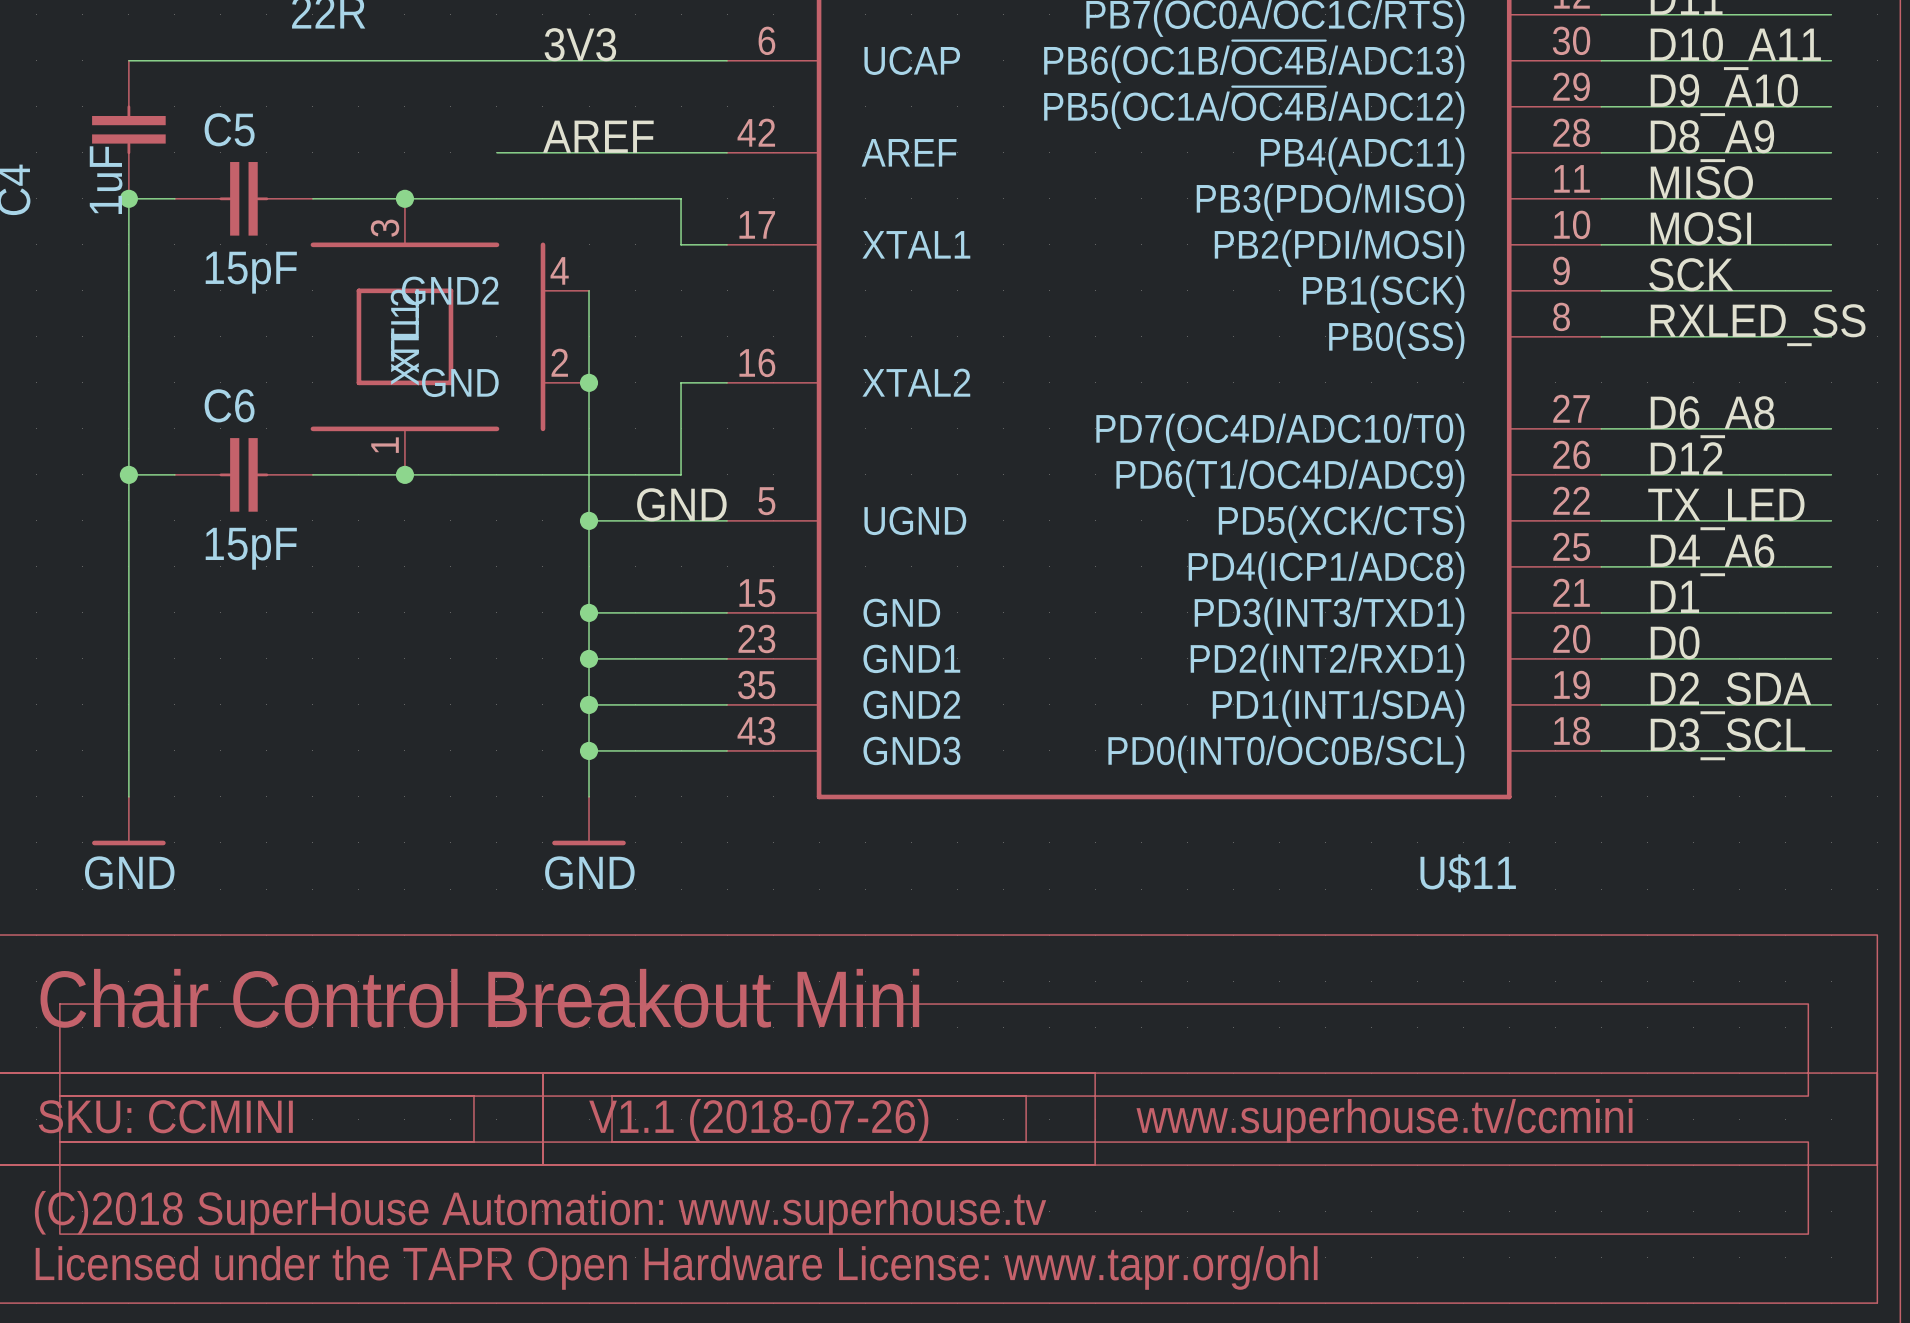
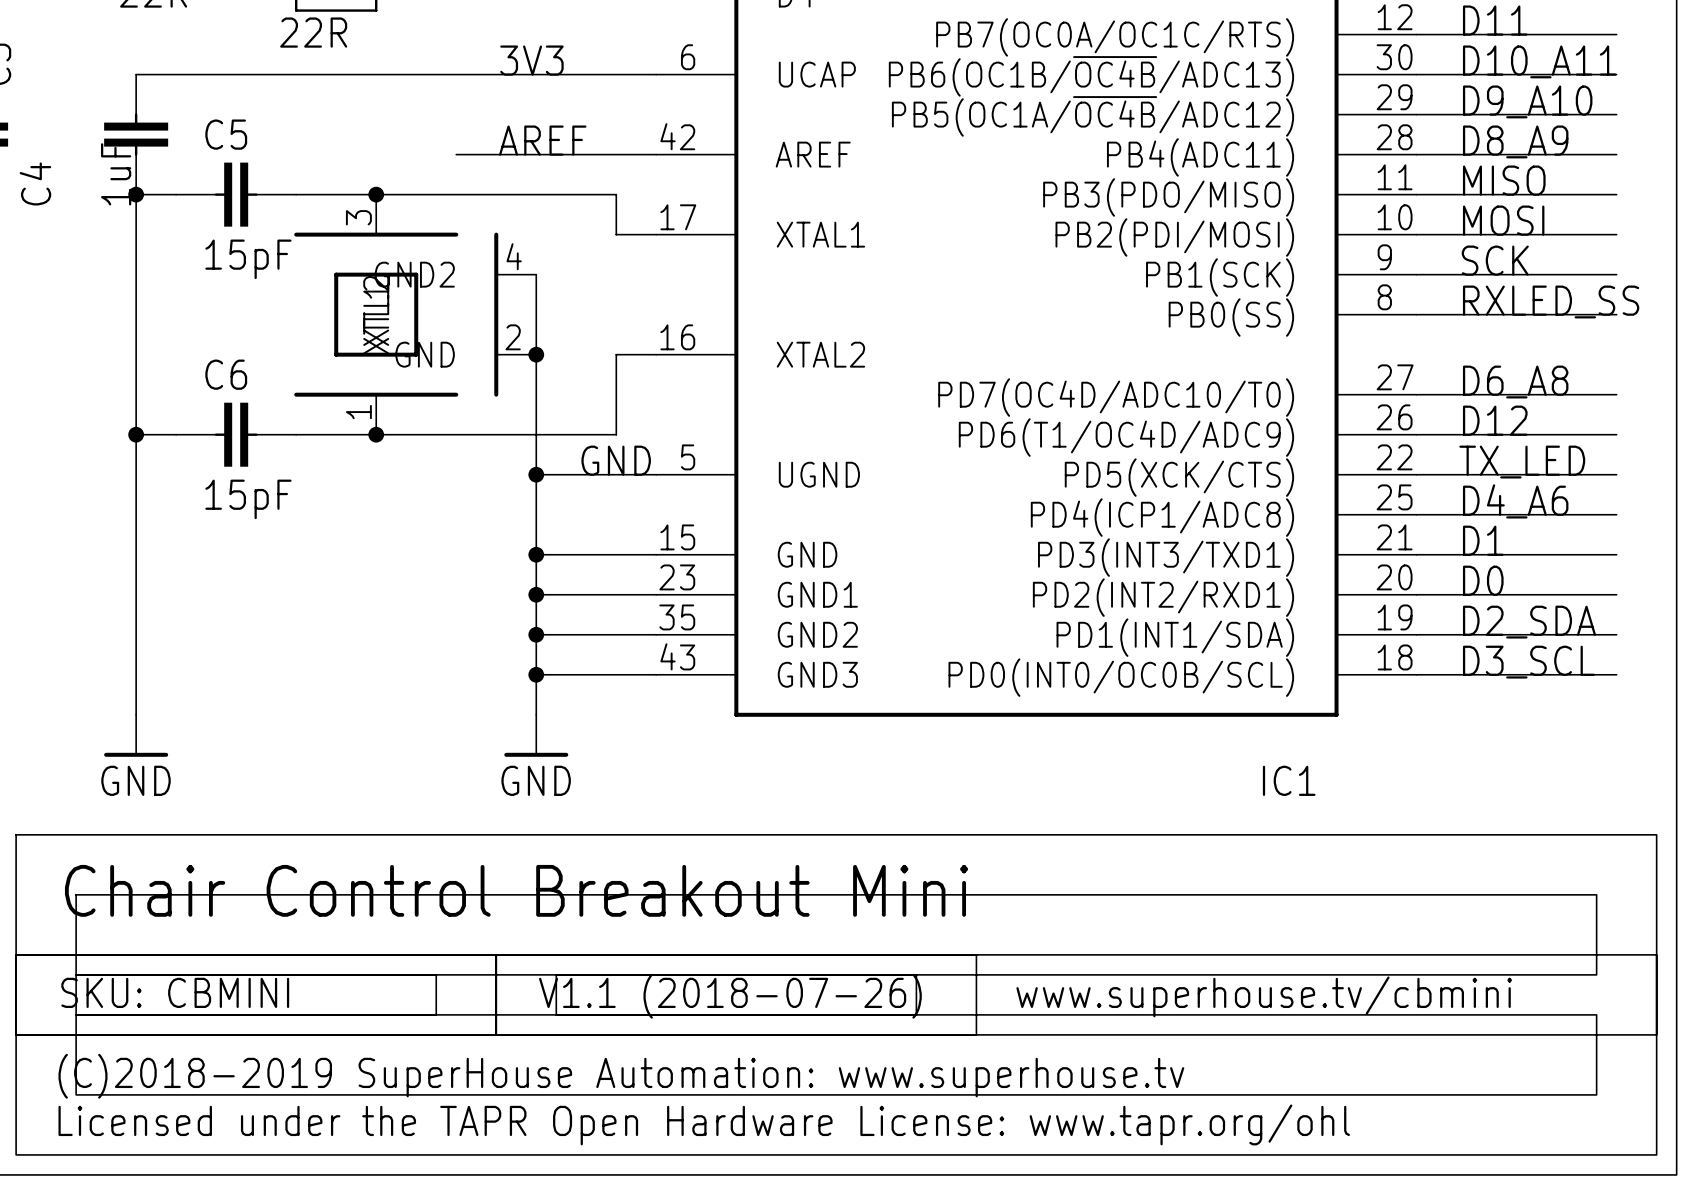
U$11 name: U$11 (1468, 873) -> IC1 (1289, 780)
text: SKU: CCMINI (165, 1116) -> SKU: CBMINI (175, 992)
text: www.superhouse.tv/ccmini (1384, 1120) -> www.superhouse.tv/cbmini (1264, 996)
text: (C)2018 SuperHouse Automation: www.superhouse.tv (540, 1212) -> (C)2018-2019 SuperHouse Automation: www.superhouse.tv (621, 1076)

